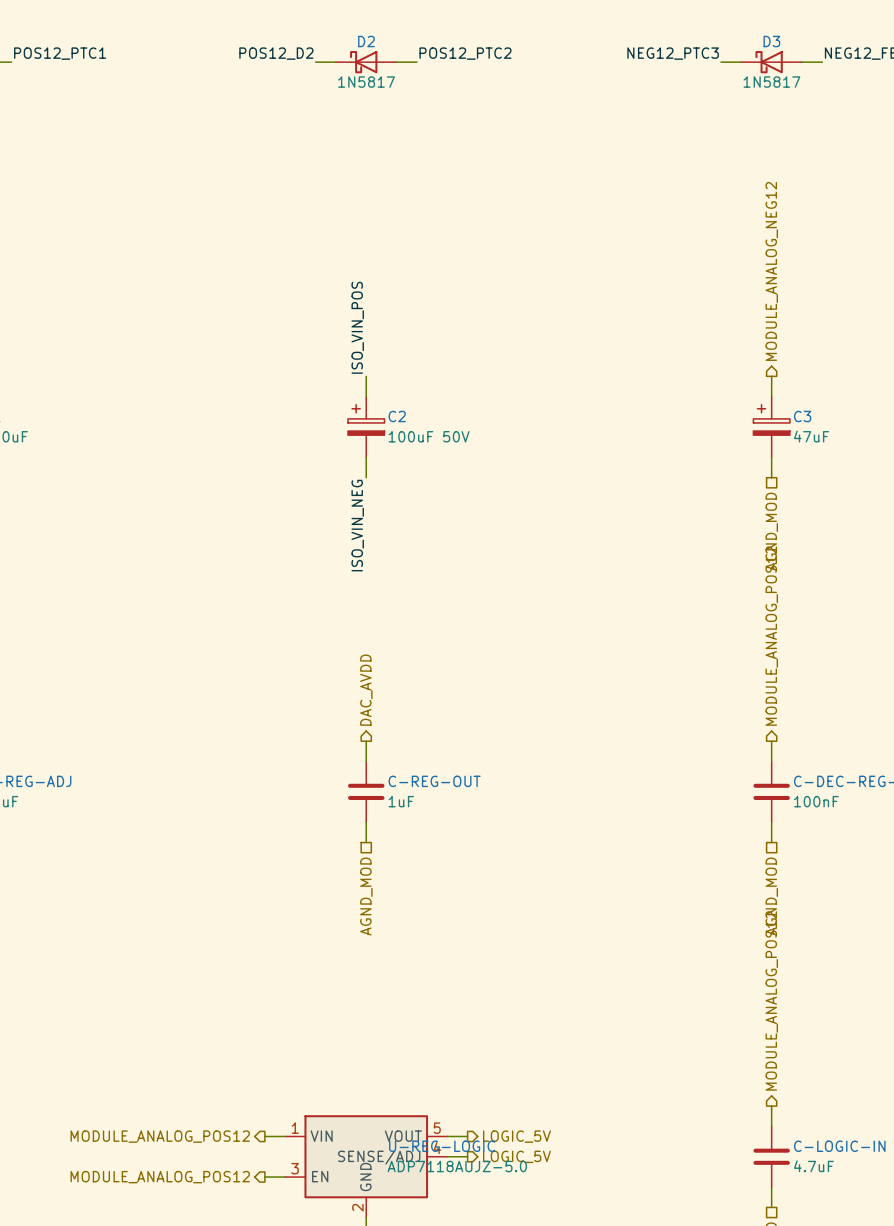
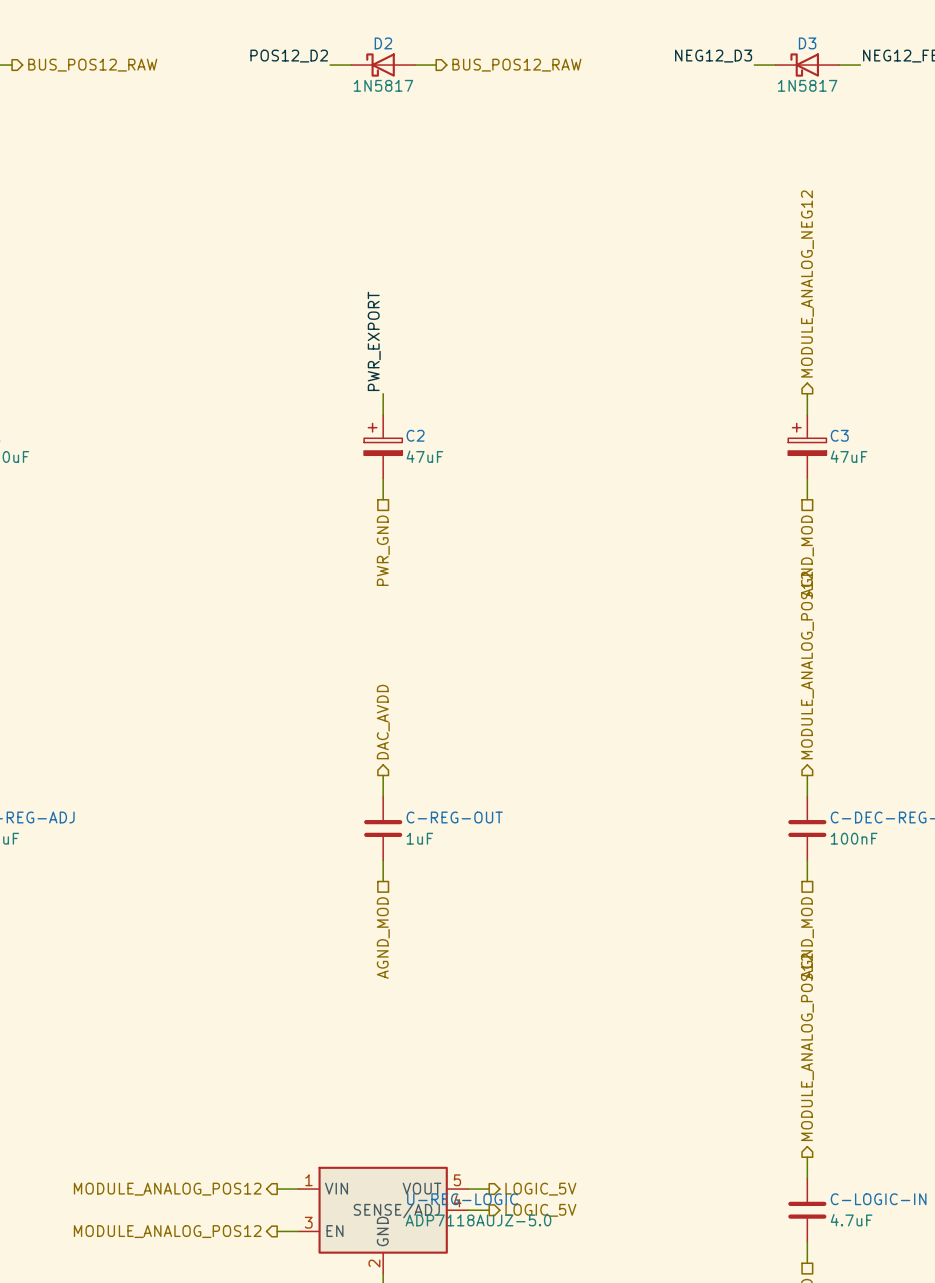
label: POS12_PTC1 (60, 53) -> none
label: POS12_PTC2 (465, 53) -> none
label: NEG12_PTC3 (673, 53) -> NEG12_D3 (713, 56)
hierarchical label: none -> BUS_POS12_RAW (92, 65)
hierarchical label: none -> BUS_POS12_RAW (516, 65)
label: ISO_VIN_POS (357, 327) -> PWR_EXPORT (374, 341)
C2 value: 100uF 50V (429, 436) -> 47uF (424, 456)
label: ISO_VIN_NEG (357, 525) -> none
hierarchical label: none -> PWR_GND (383, 550)

